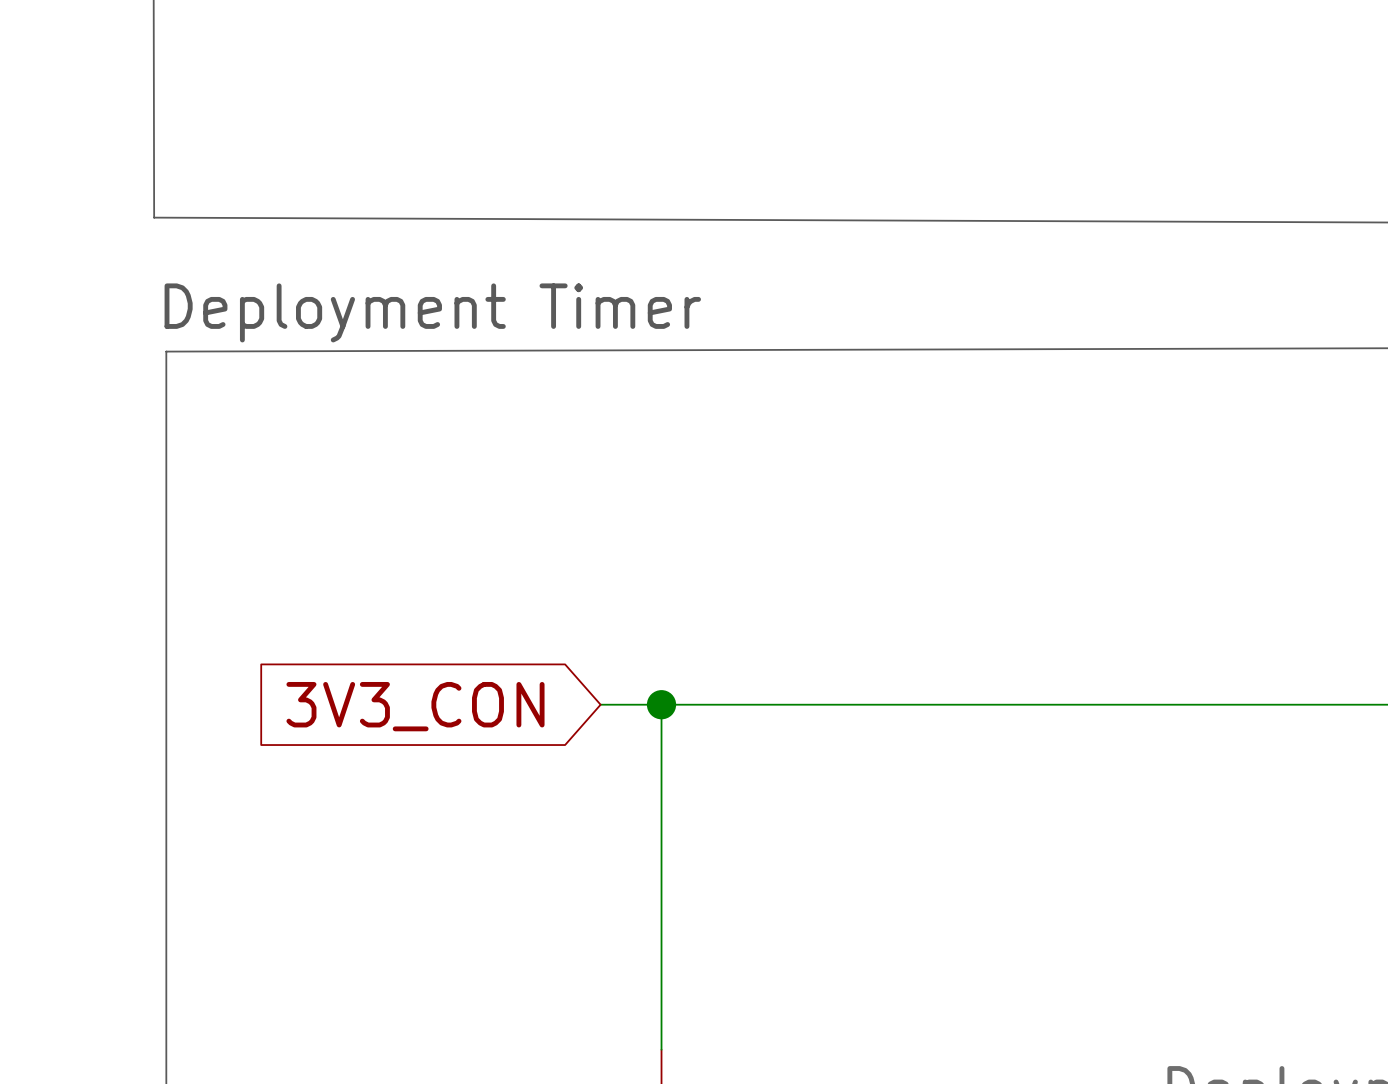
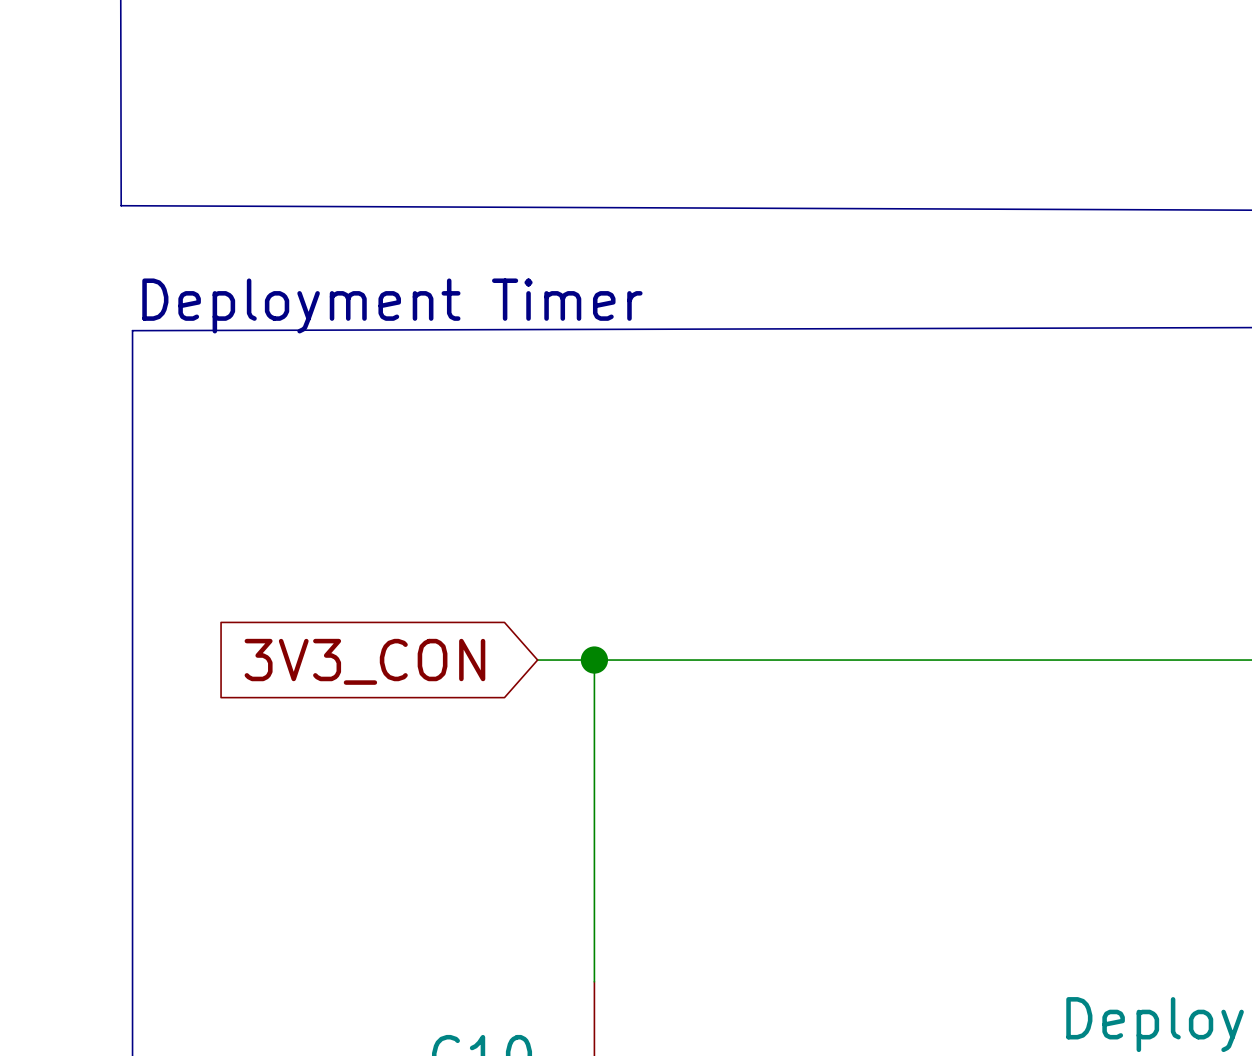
text position: Deployment Timer (432, 312) -> Deployment Timer (392, 305)

